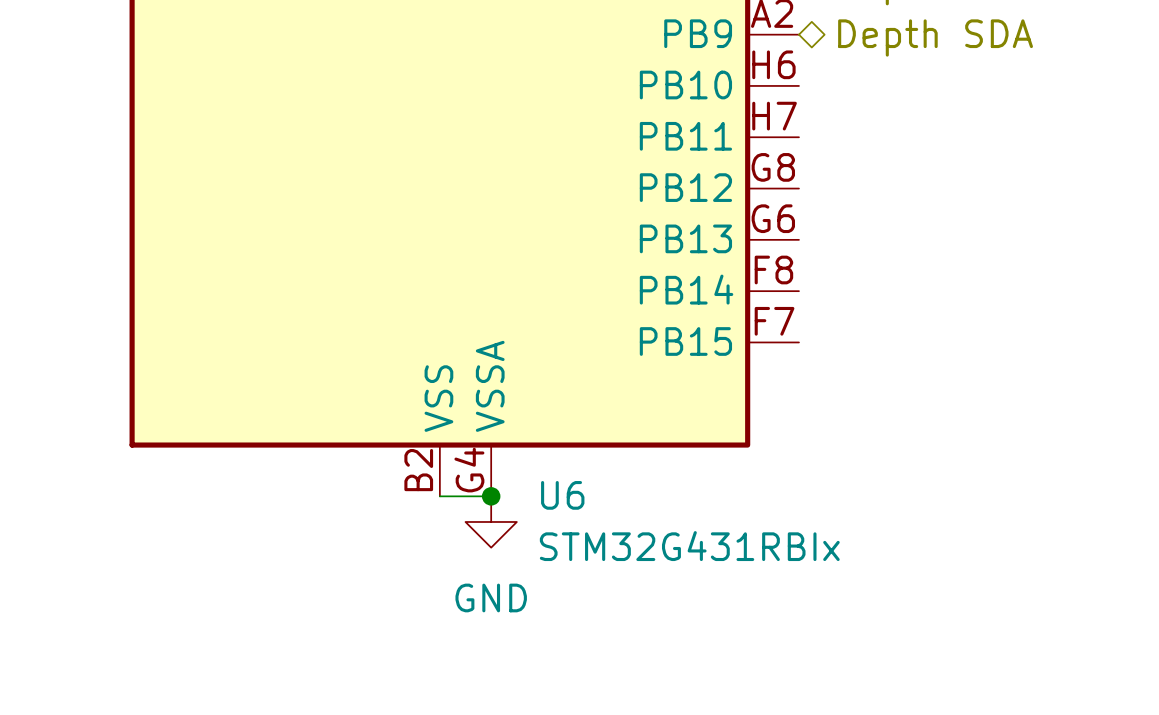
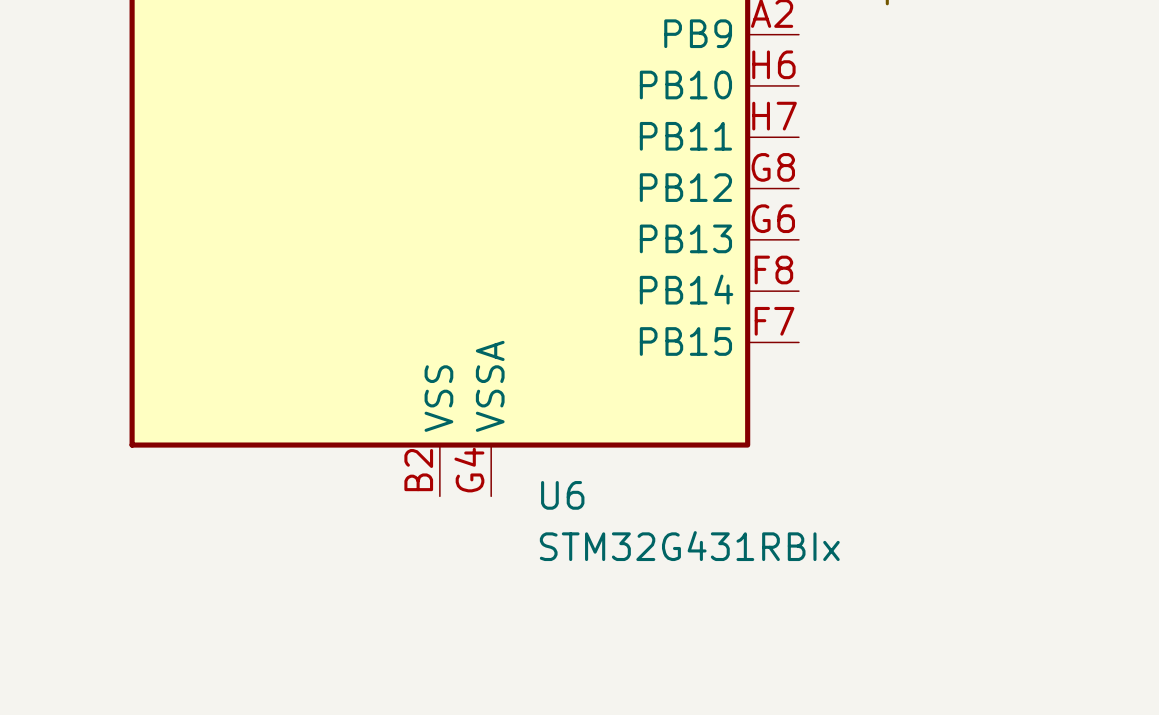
hierarchical label: Depth SDA (935, 37) -> none
wire: (439, 496) (491, 496) -> none
junction: (491, 496) -> none
power symbol: GND (491, 521) -> none

